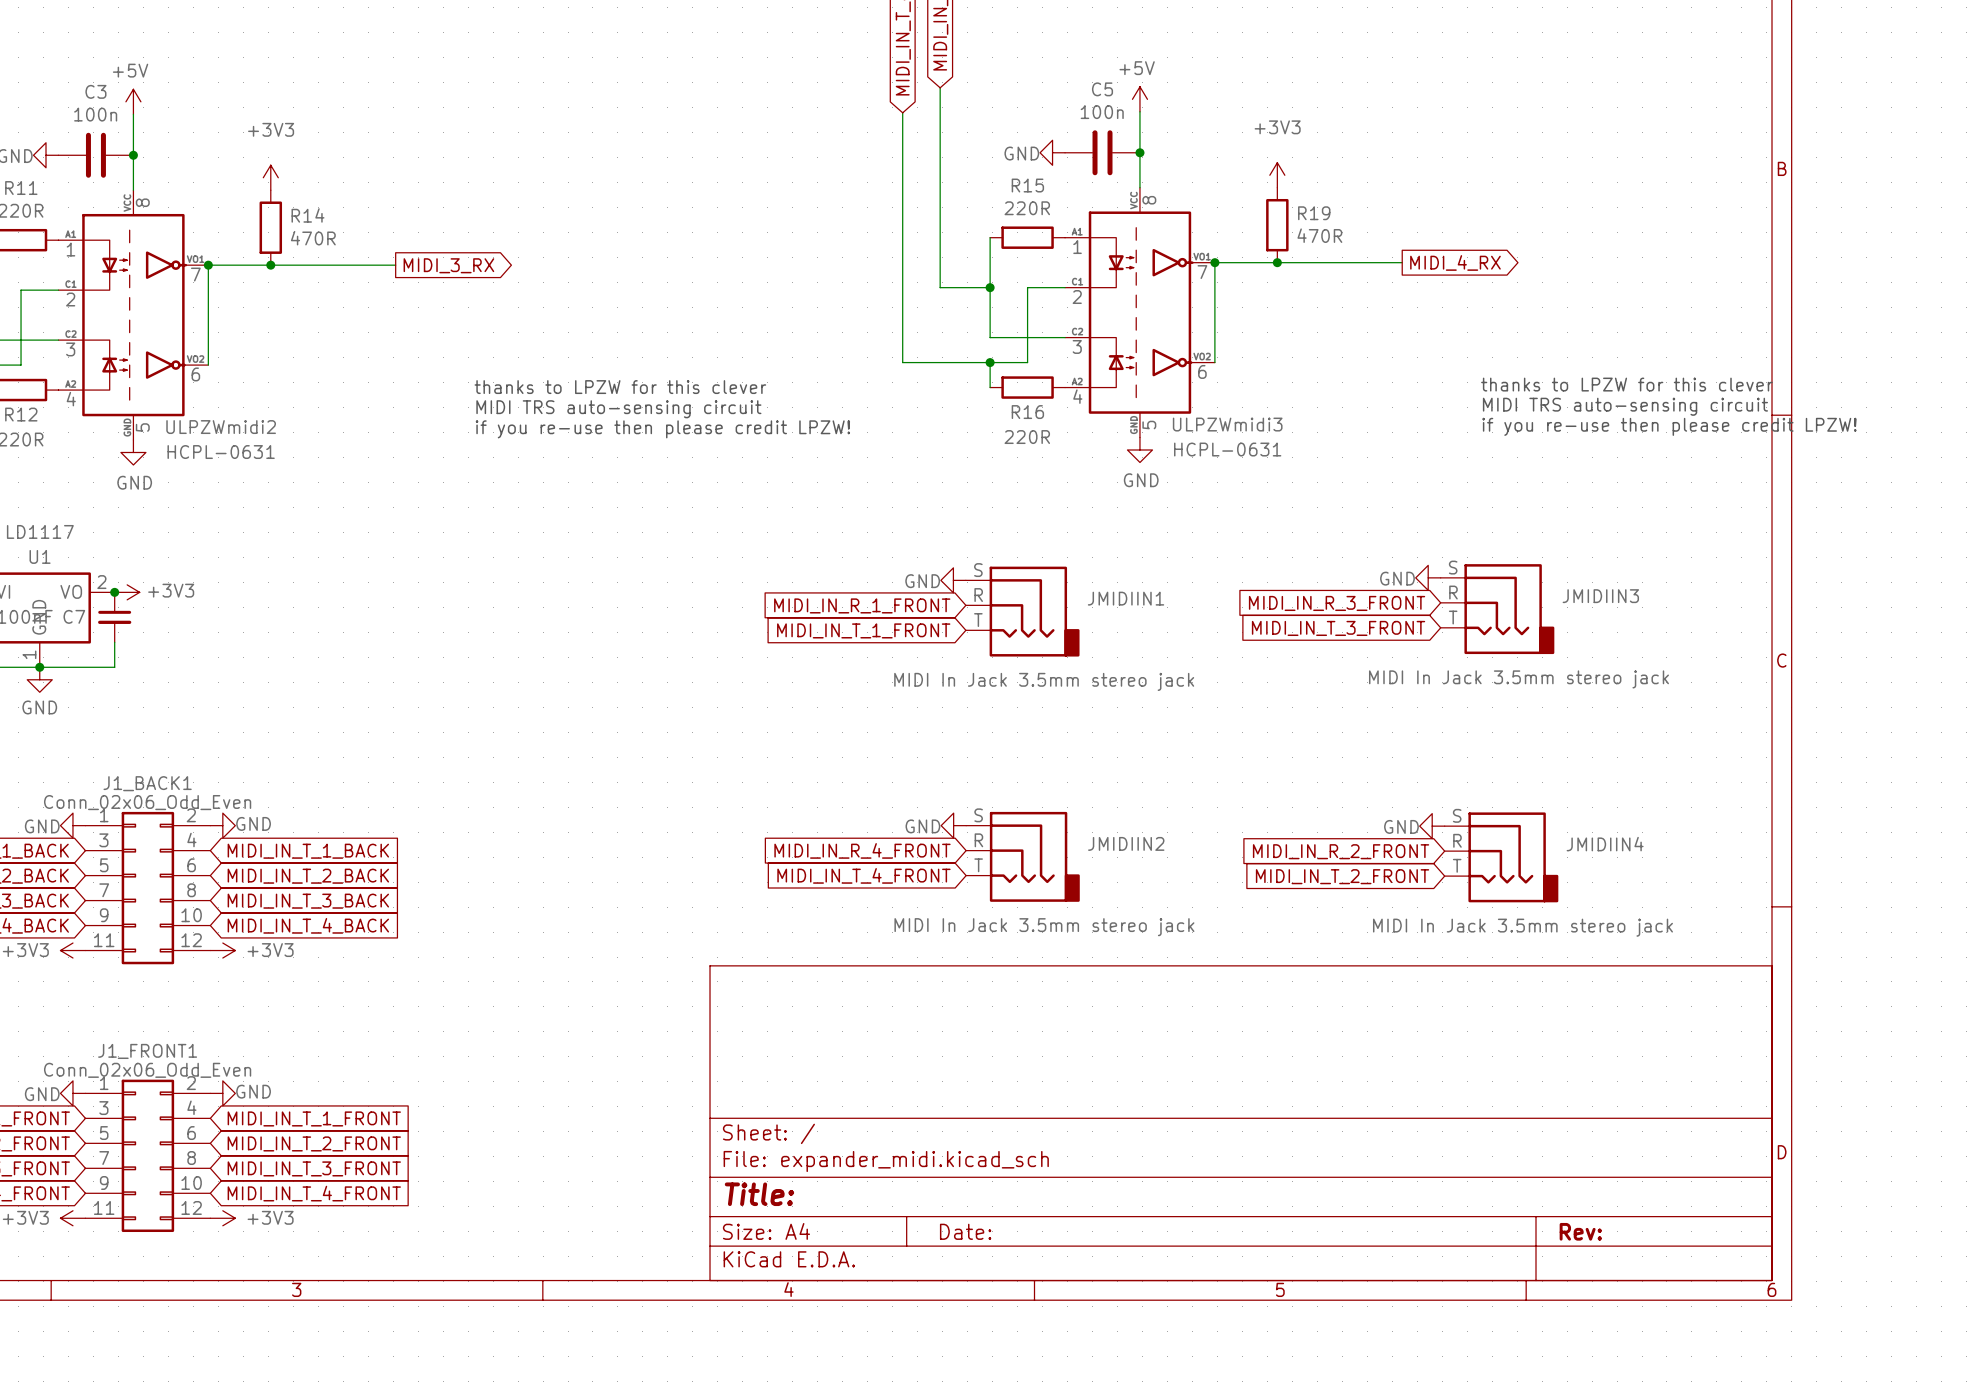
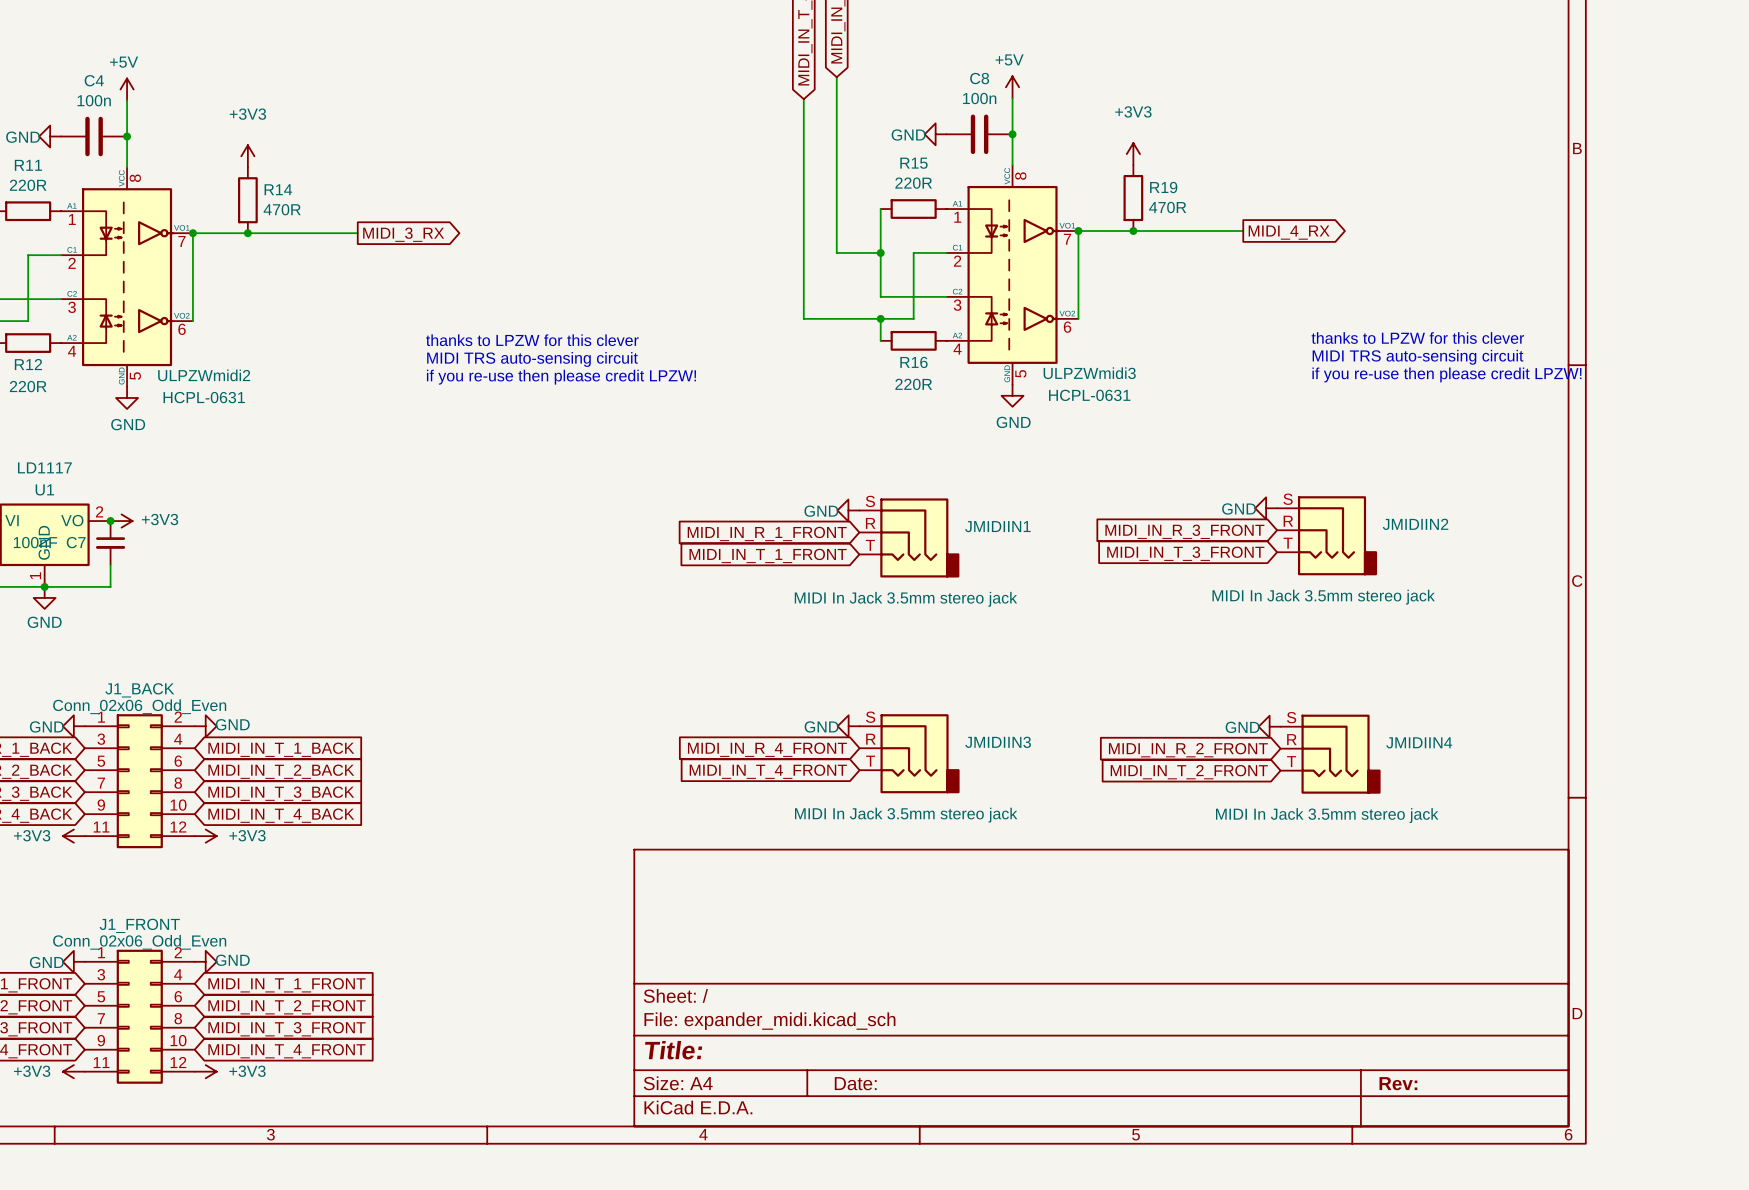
C5 name: C5 (1102, 89) -> C8 (979, 78)
C3 name: C3 (95, 91) -> C4 (94, 80)
JMIDIIN3 name: JMIDIIN3 (1600, 596) -> JMIDIIN2 (1415, 524)
J1_BACK1 name: J1_BACK1 (147, 783) -> J1_BACK (139, 690)
JMIDIIN2 name: JMIDIIN2 (1126, 843) -> JMIDIIN3 (998, 742)
J1_FRONT1 name: J1_FRONT1 (147, 1051) -> J1_FRONT (139, 925)

